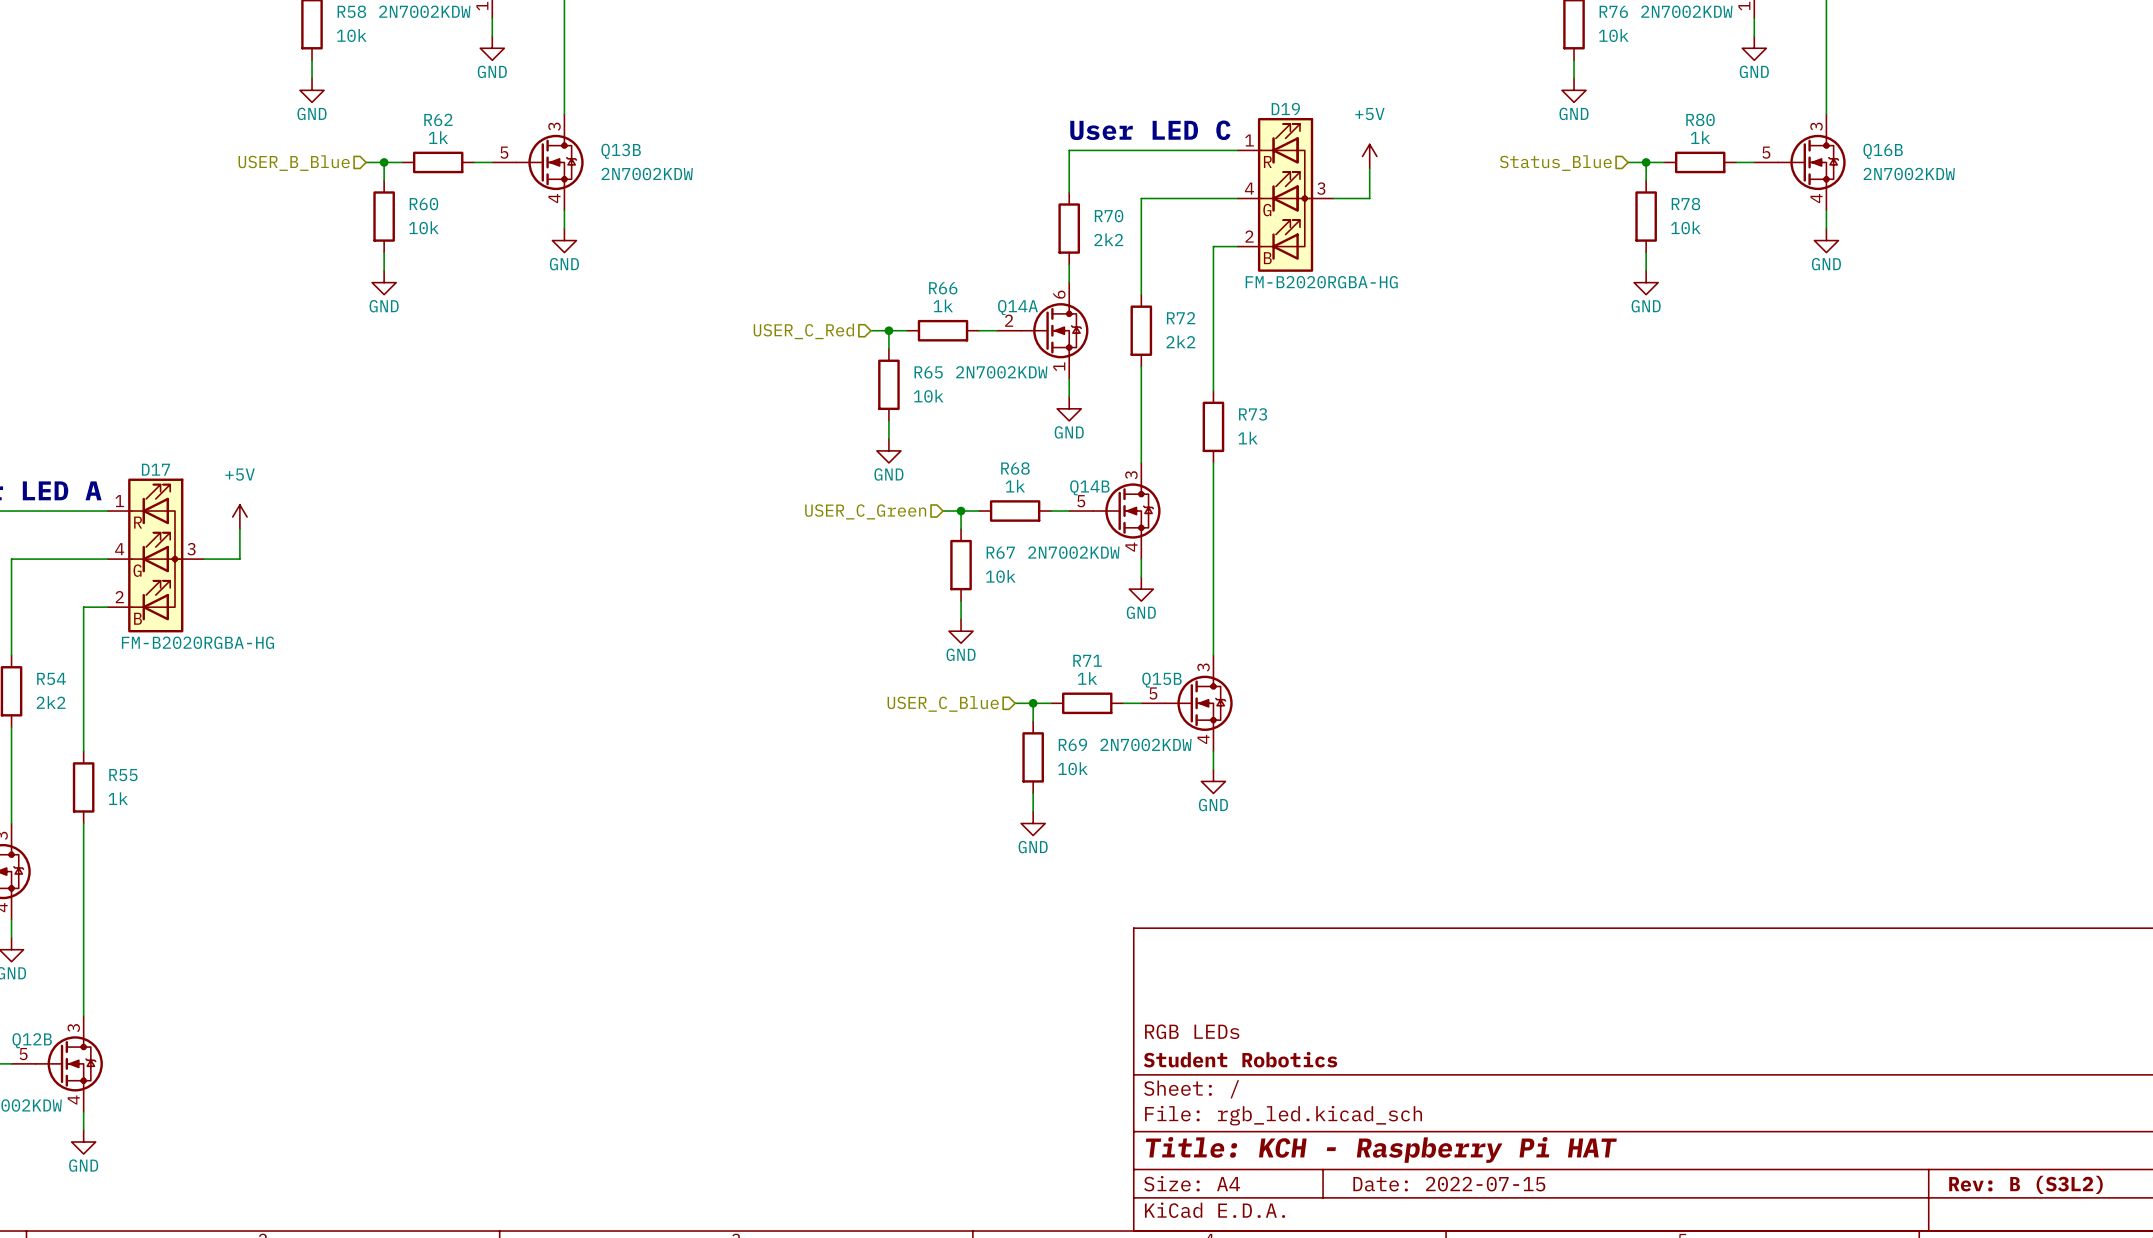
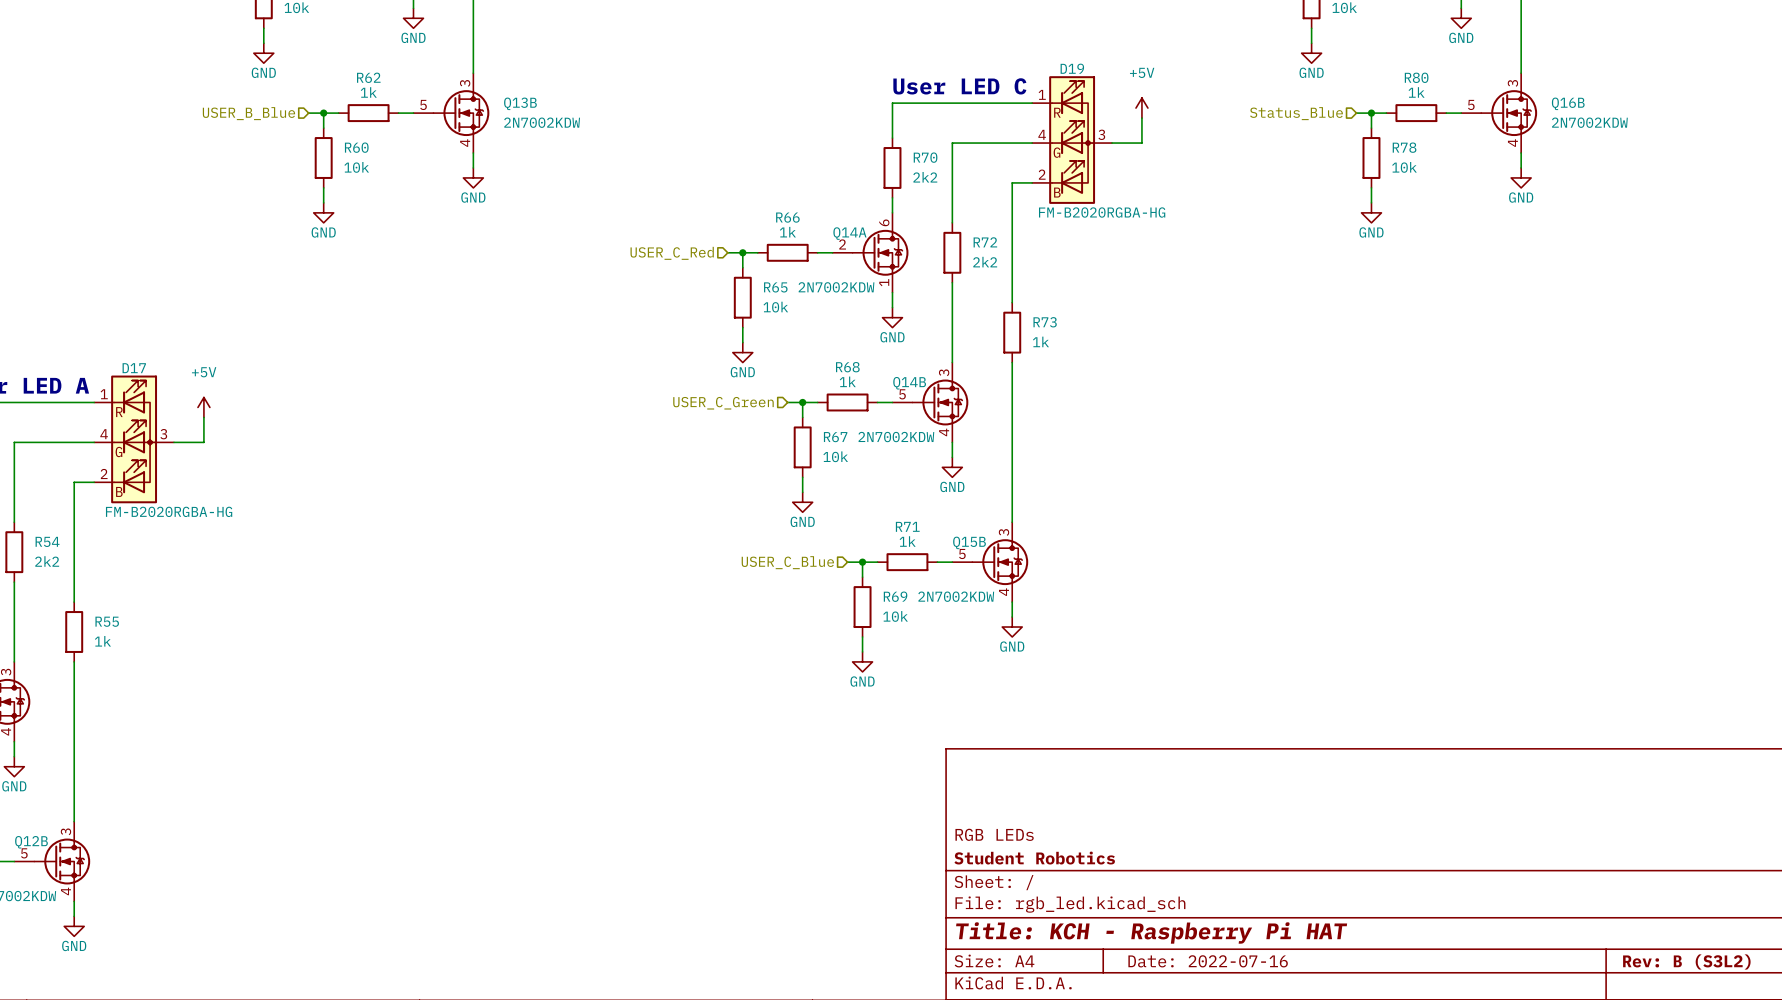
title block: Date: 2022-07-15 (1449, 1184) -> Date: 2022-07-16 (1208, 961)

